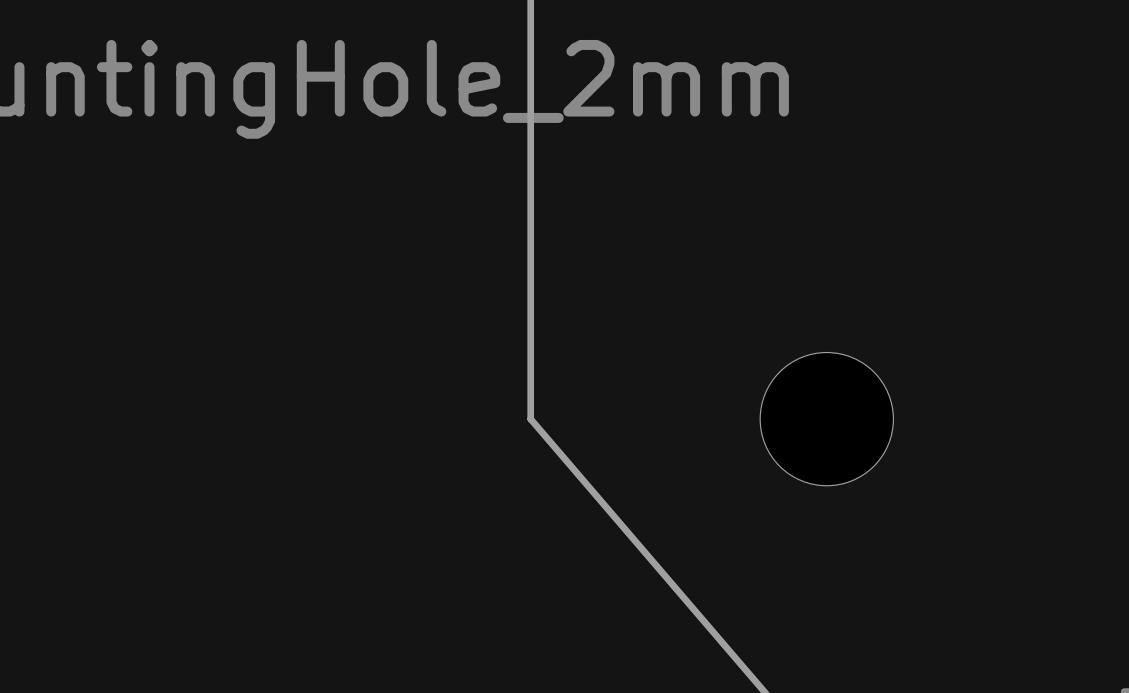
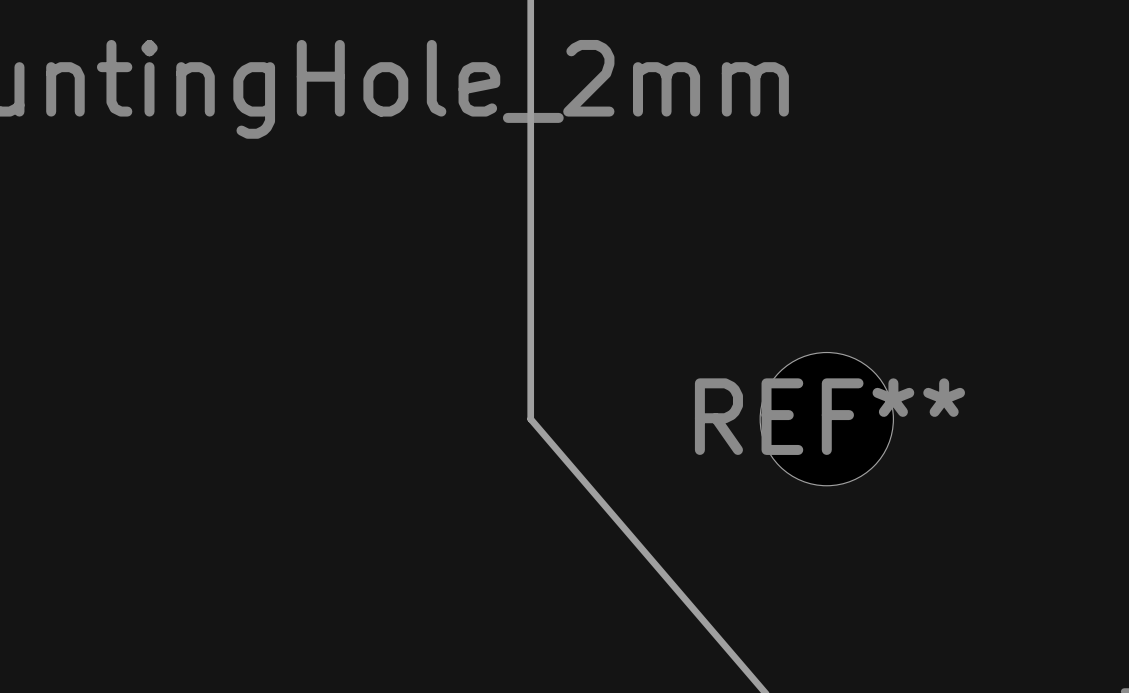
REF** name: none -> REF** (829, 416)

